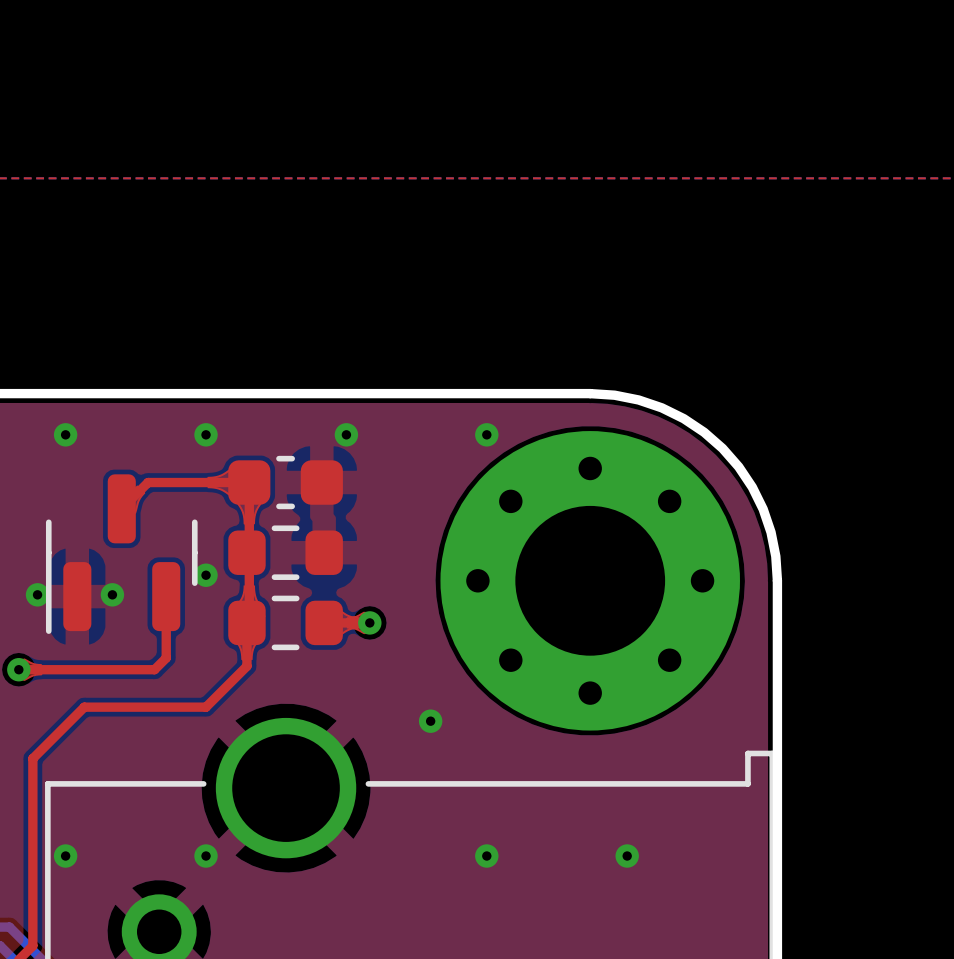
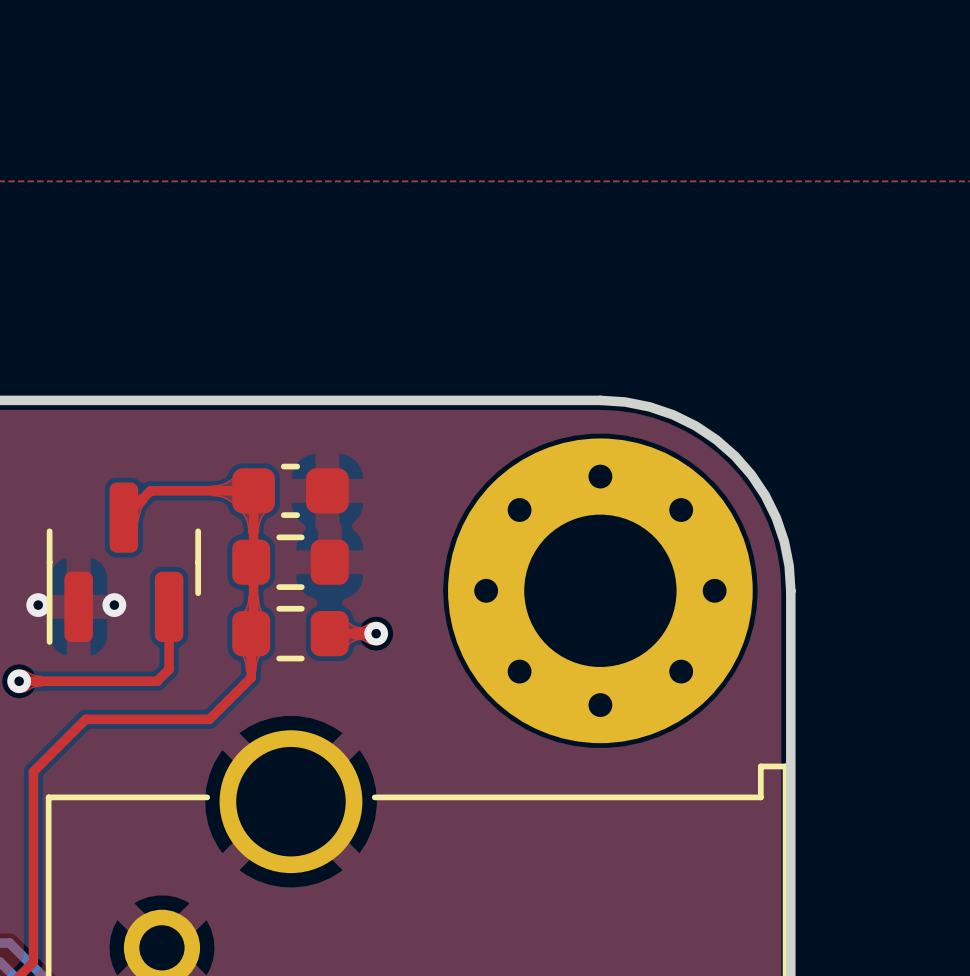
via: (65, 434) -> none
via: (206, 434) -> none
via: (346, 434) -> none
via: (486, 434) -> none
via: (206, 575) -> none
via: (430, 721) -> none
via: (65, 856) -> none
via: (206, 856) -> none
via: (486, 856) -> none
via: (627, 856) -> none

